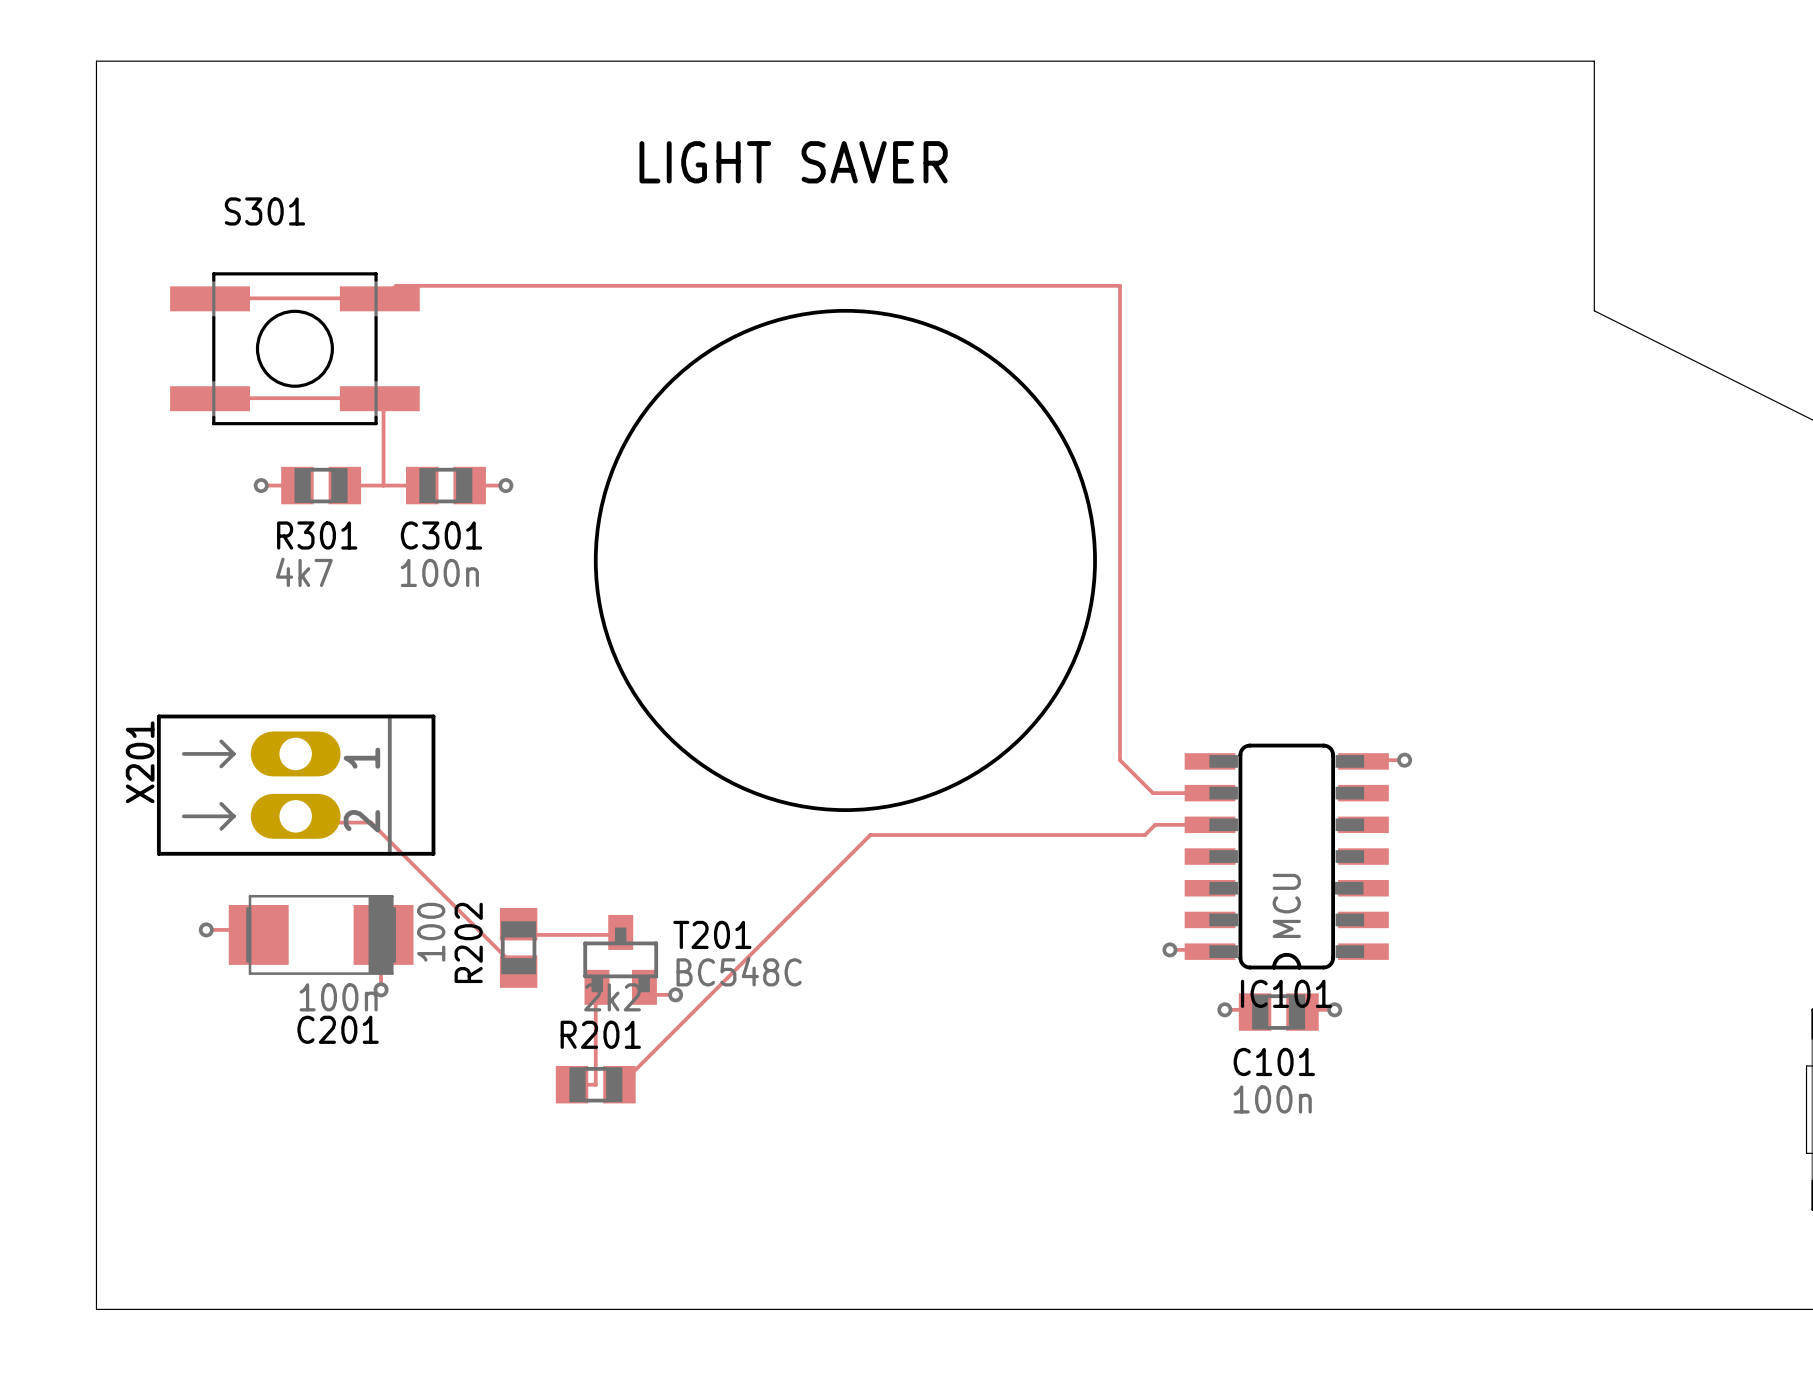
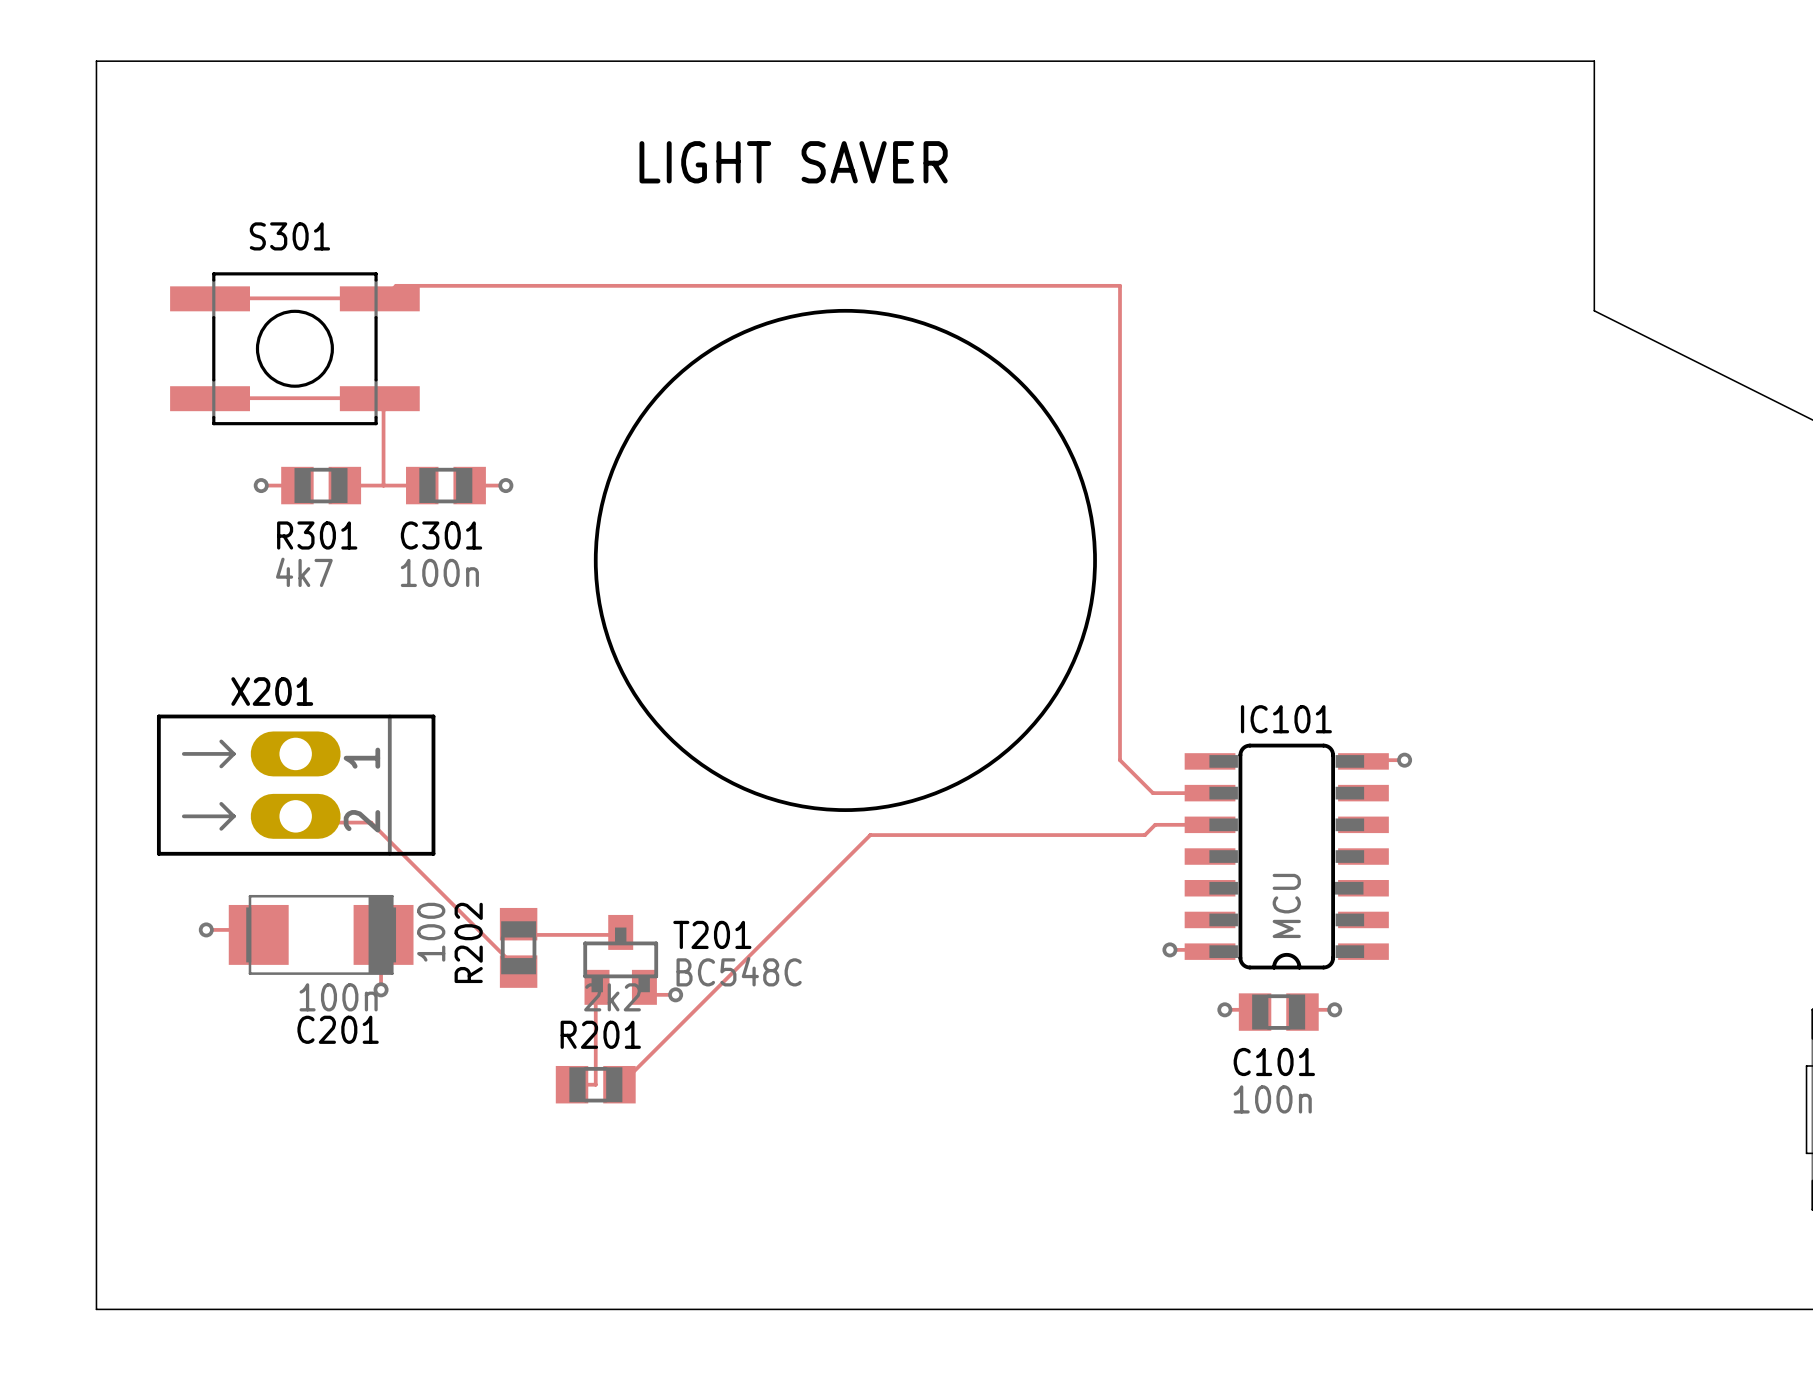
S301 name position: S301 (264, 211) -> S301 (289, 236)
X201 name rotation: 0° (140, 762) -> 90° clockwise (272, 691)
X201 name position: X201 (140, 762) -> X201 (272, 691)
IC101 name position: IC101 (1286, 993) -> IC101 (1286, 719)

